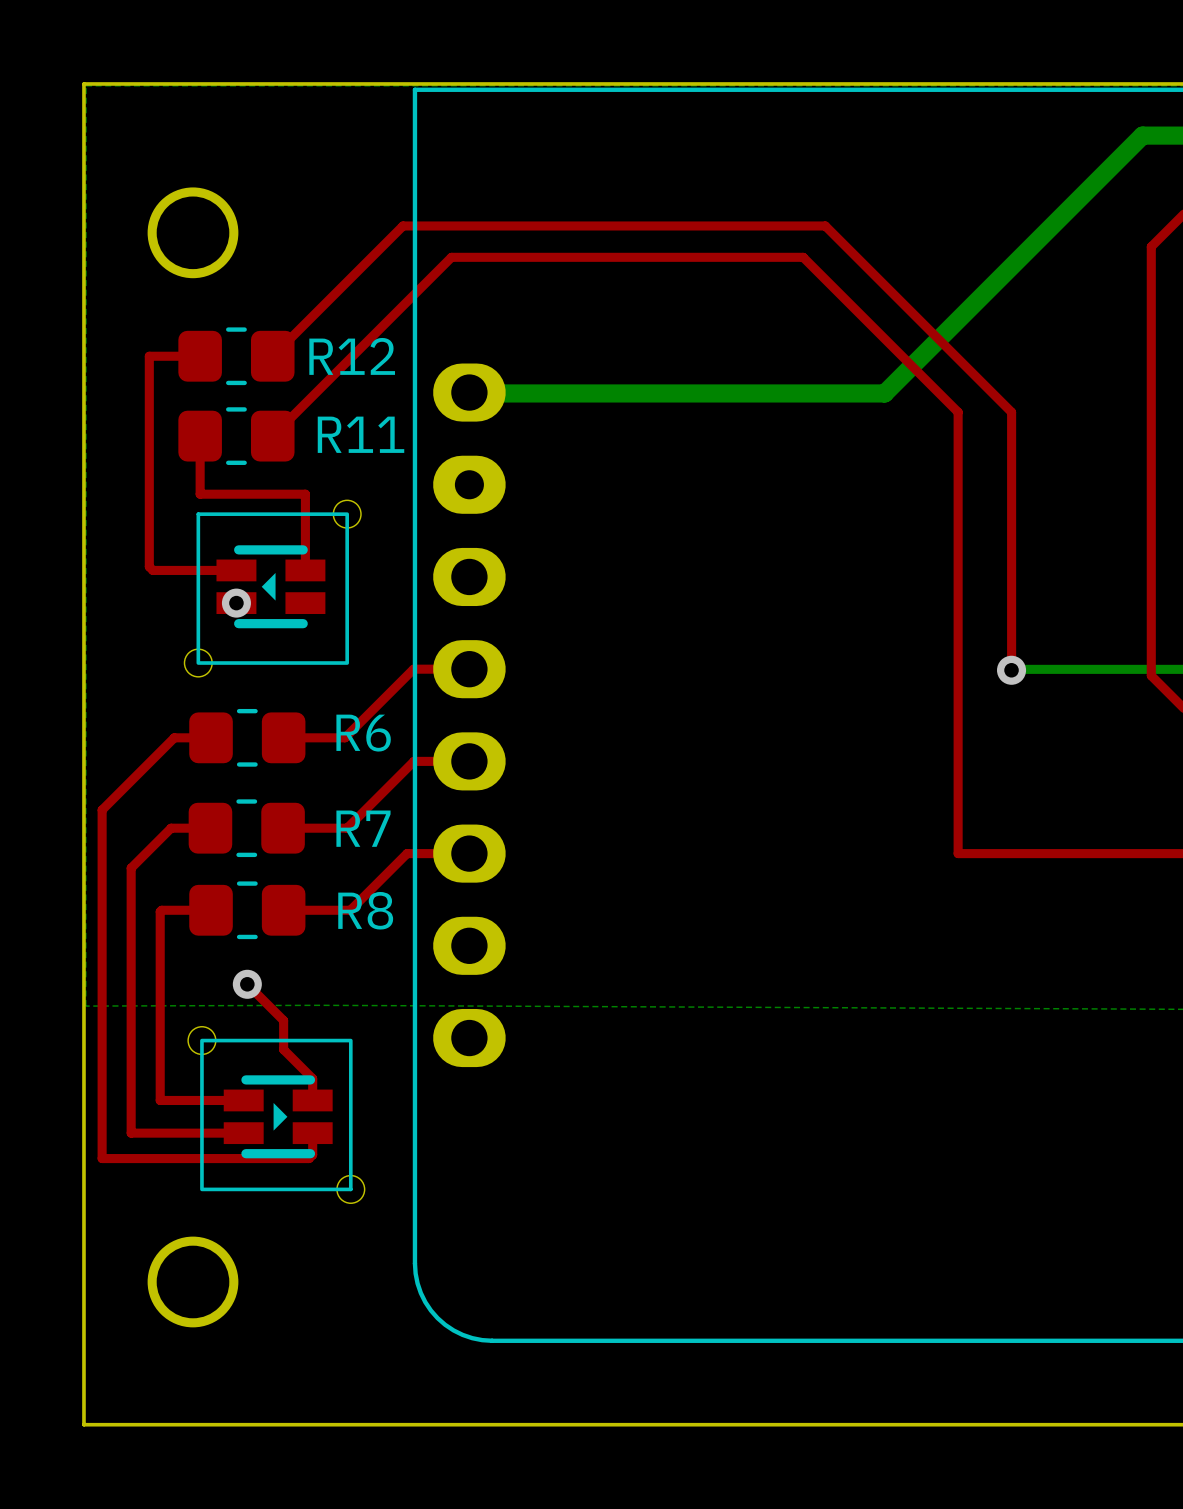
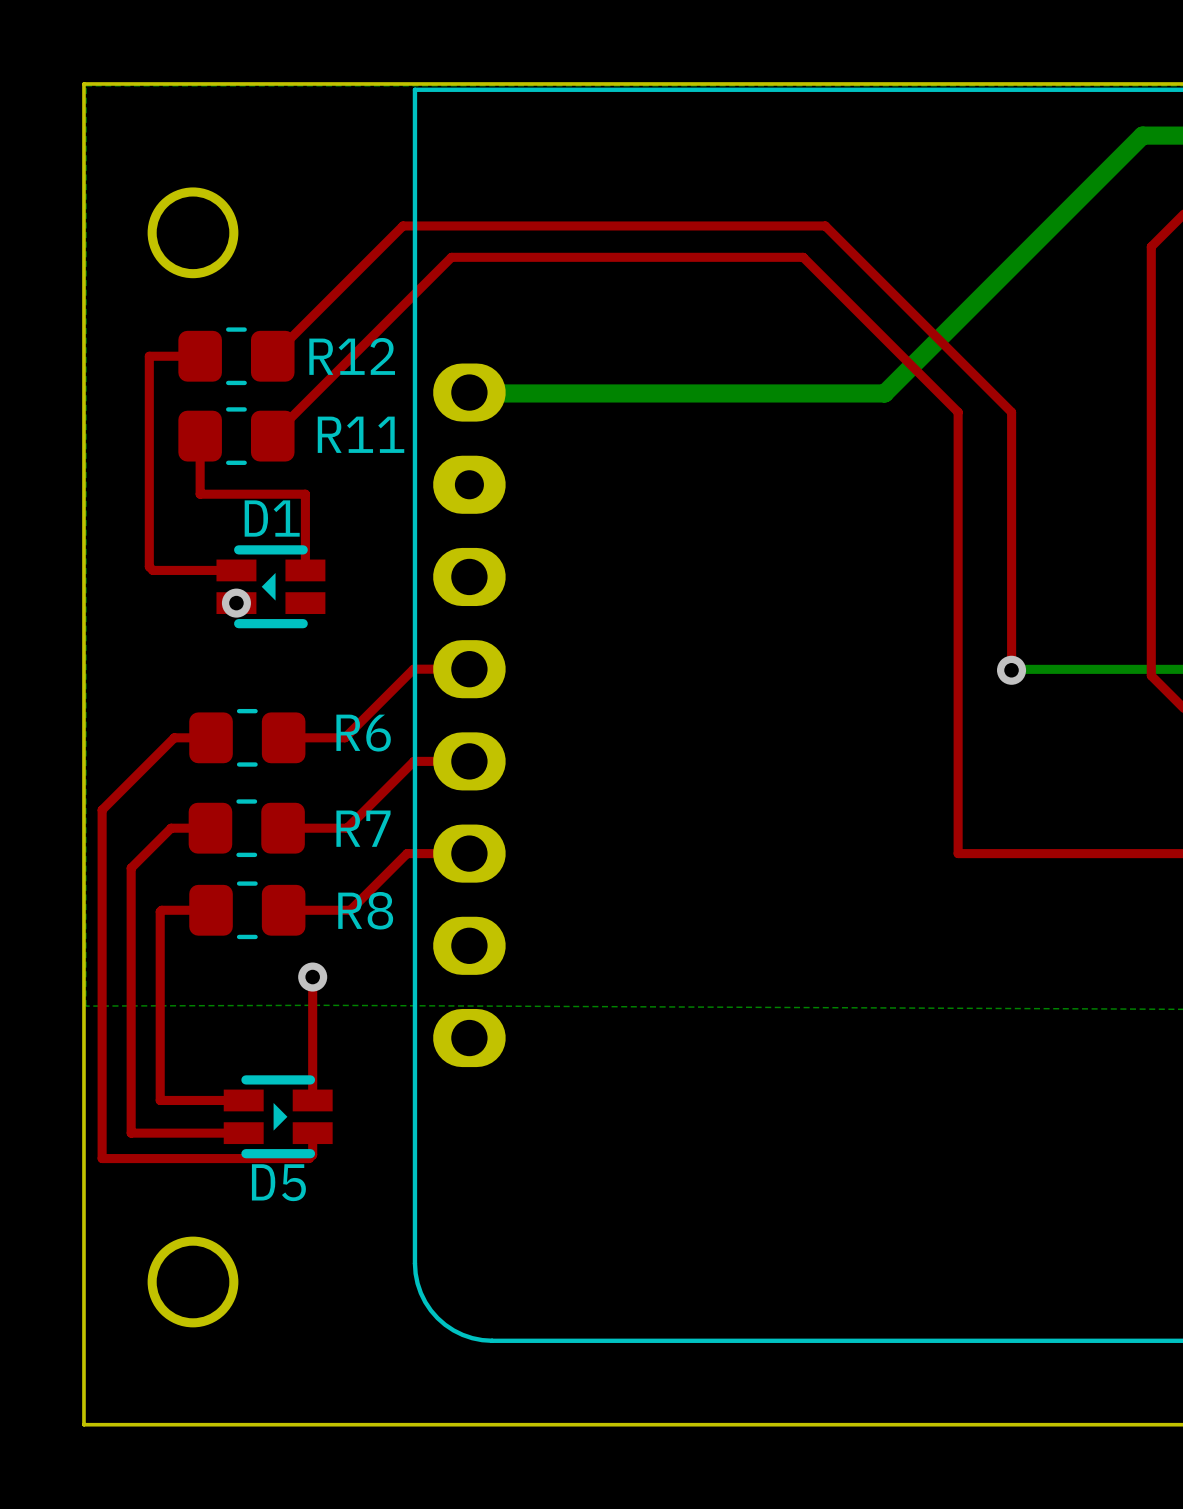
D1: none -> (270, 586)
part: (272, 588) -> none
top track: (247, 984) (283, 1020) (283, 1049) (312, 1078) -> (312, 977) (312, 1078)
via position: (247, 984) -> (312, 977)
part: (276, 1114) -> none
D5: none -> (278, 1116)

